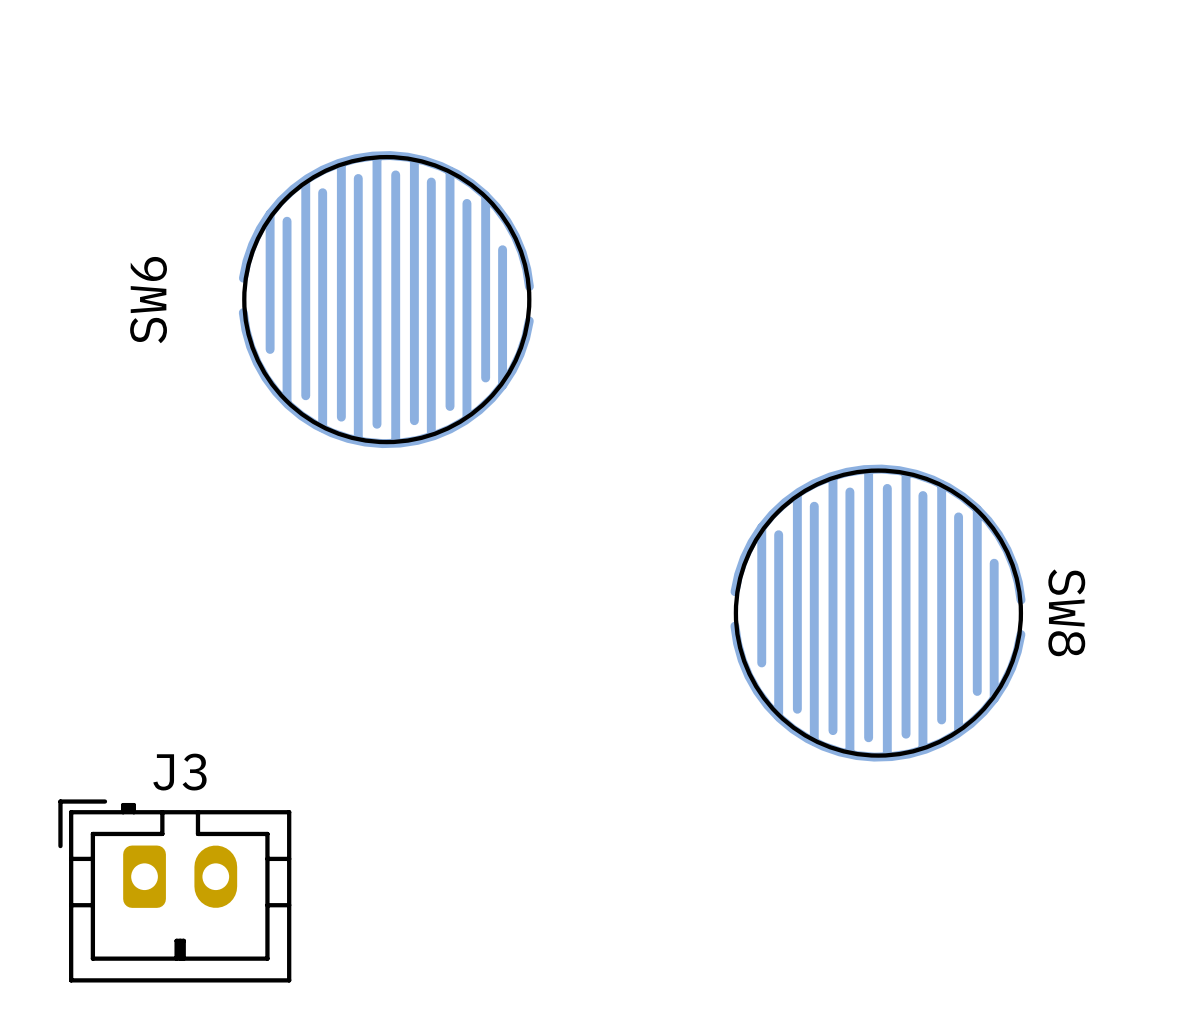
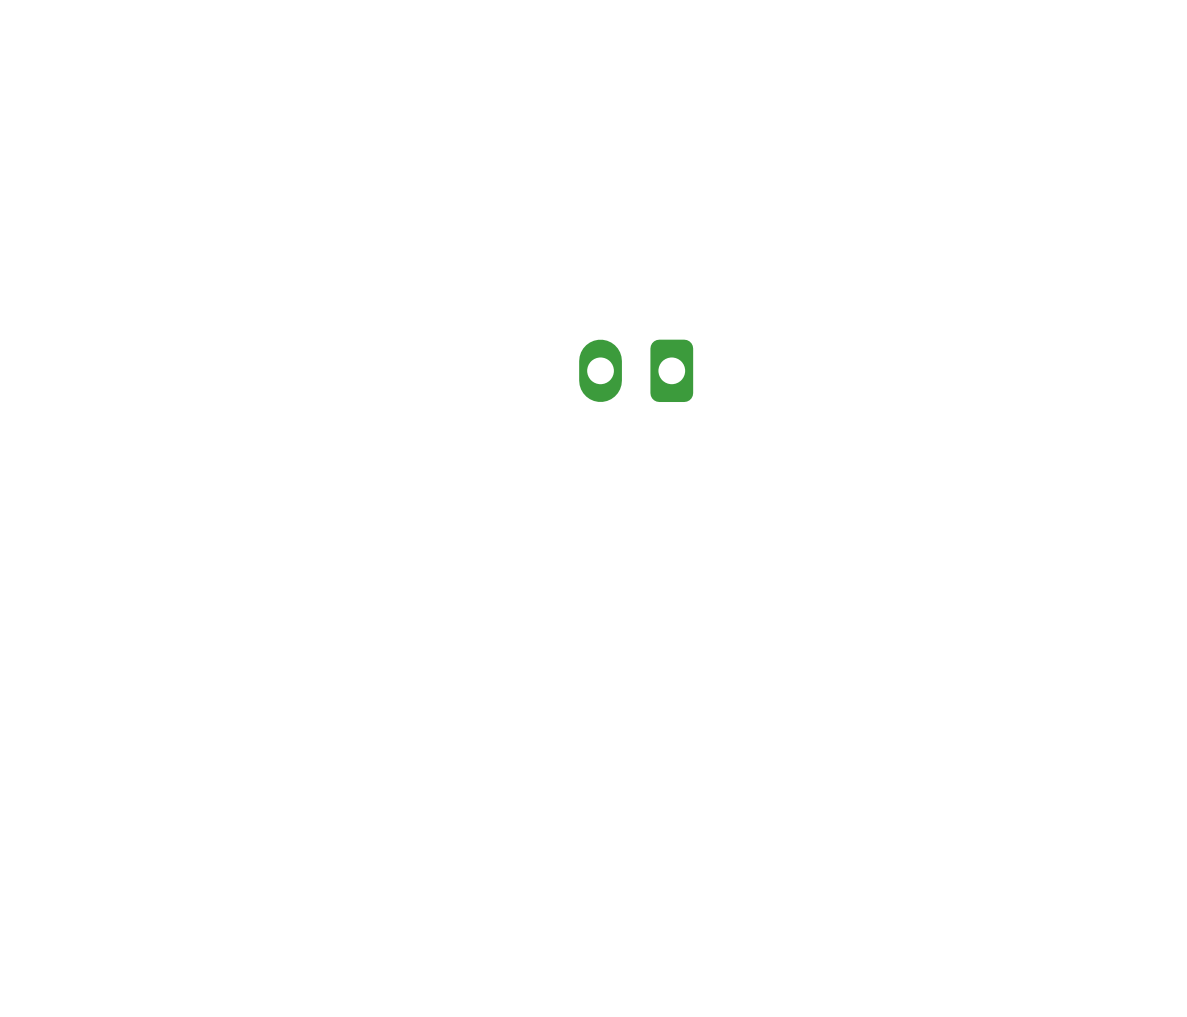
SW6: (386, 299) -> none
SW8: (877, 613) -> none
J3 side: bottom (174, 890) -> top (636, 370)

